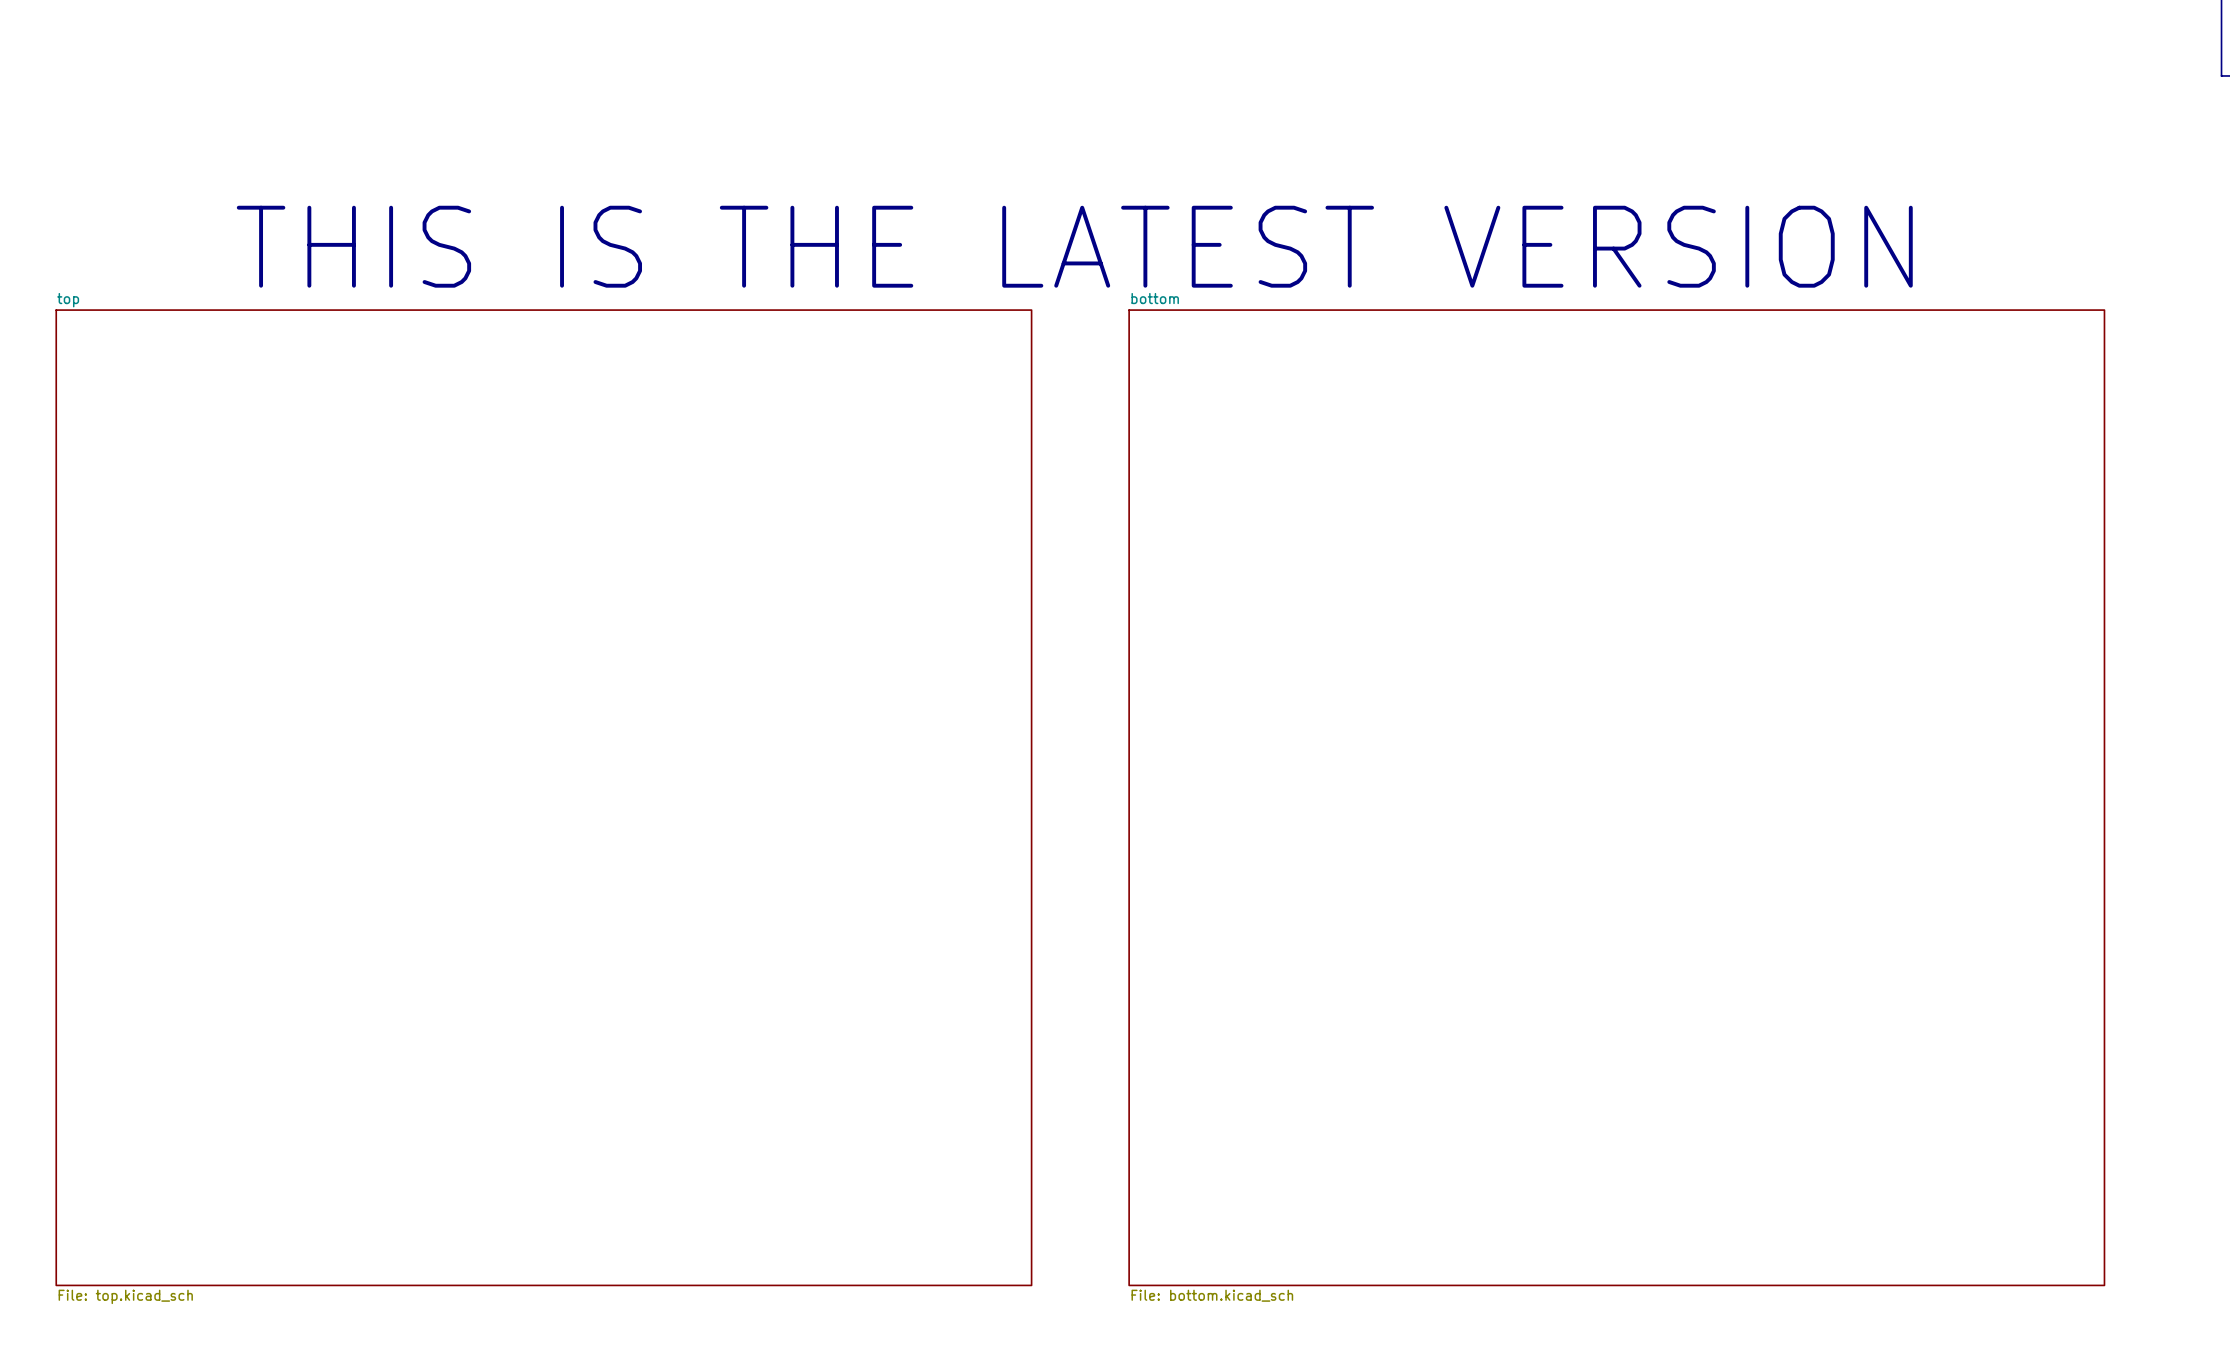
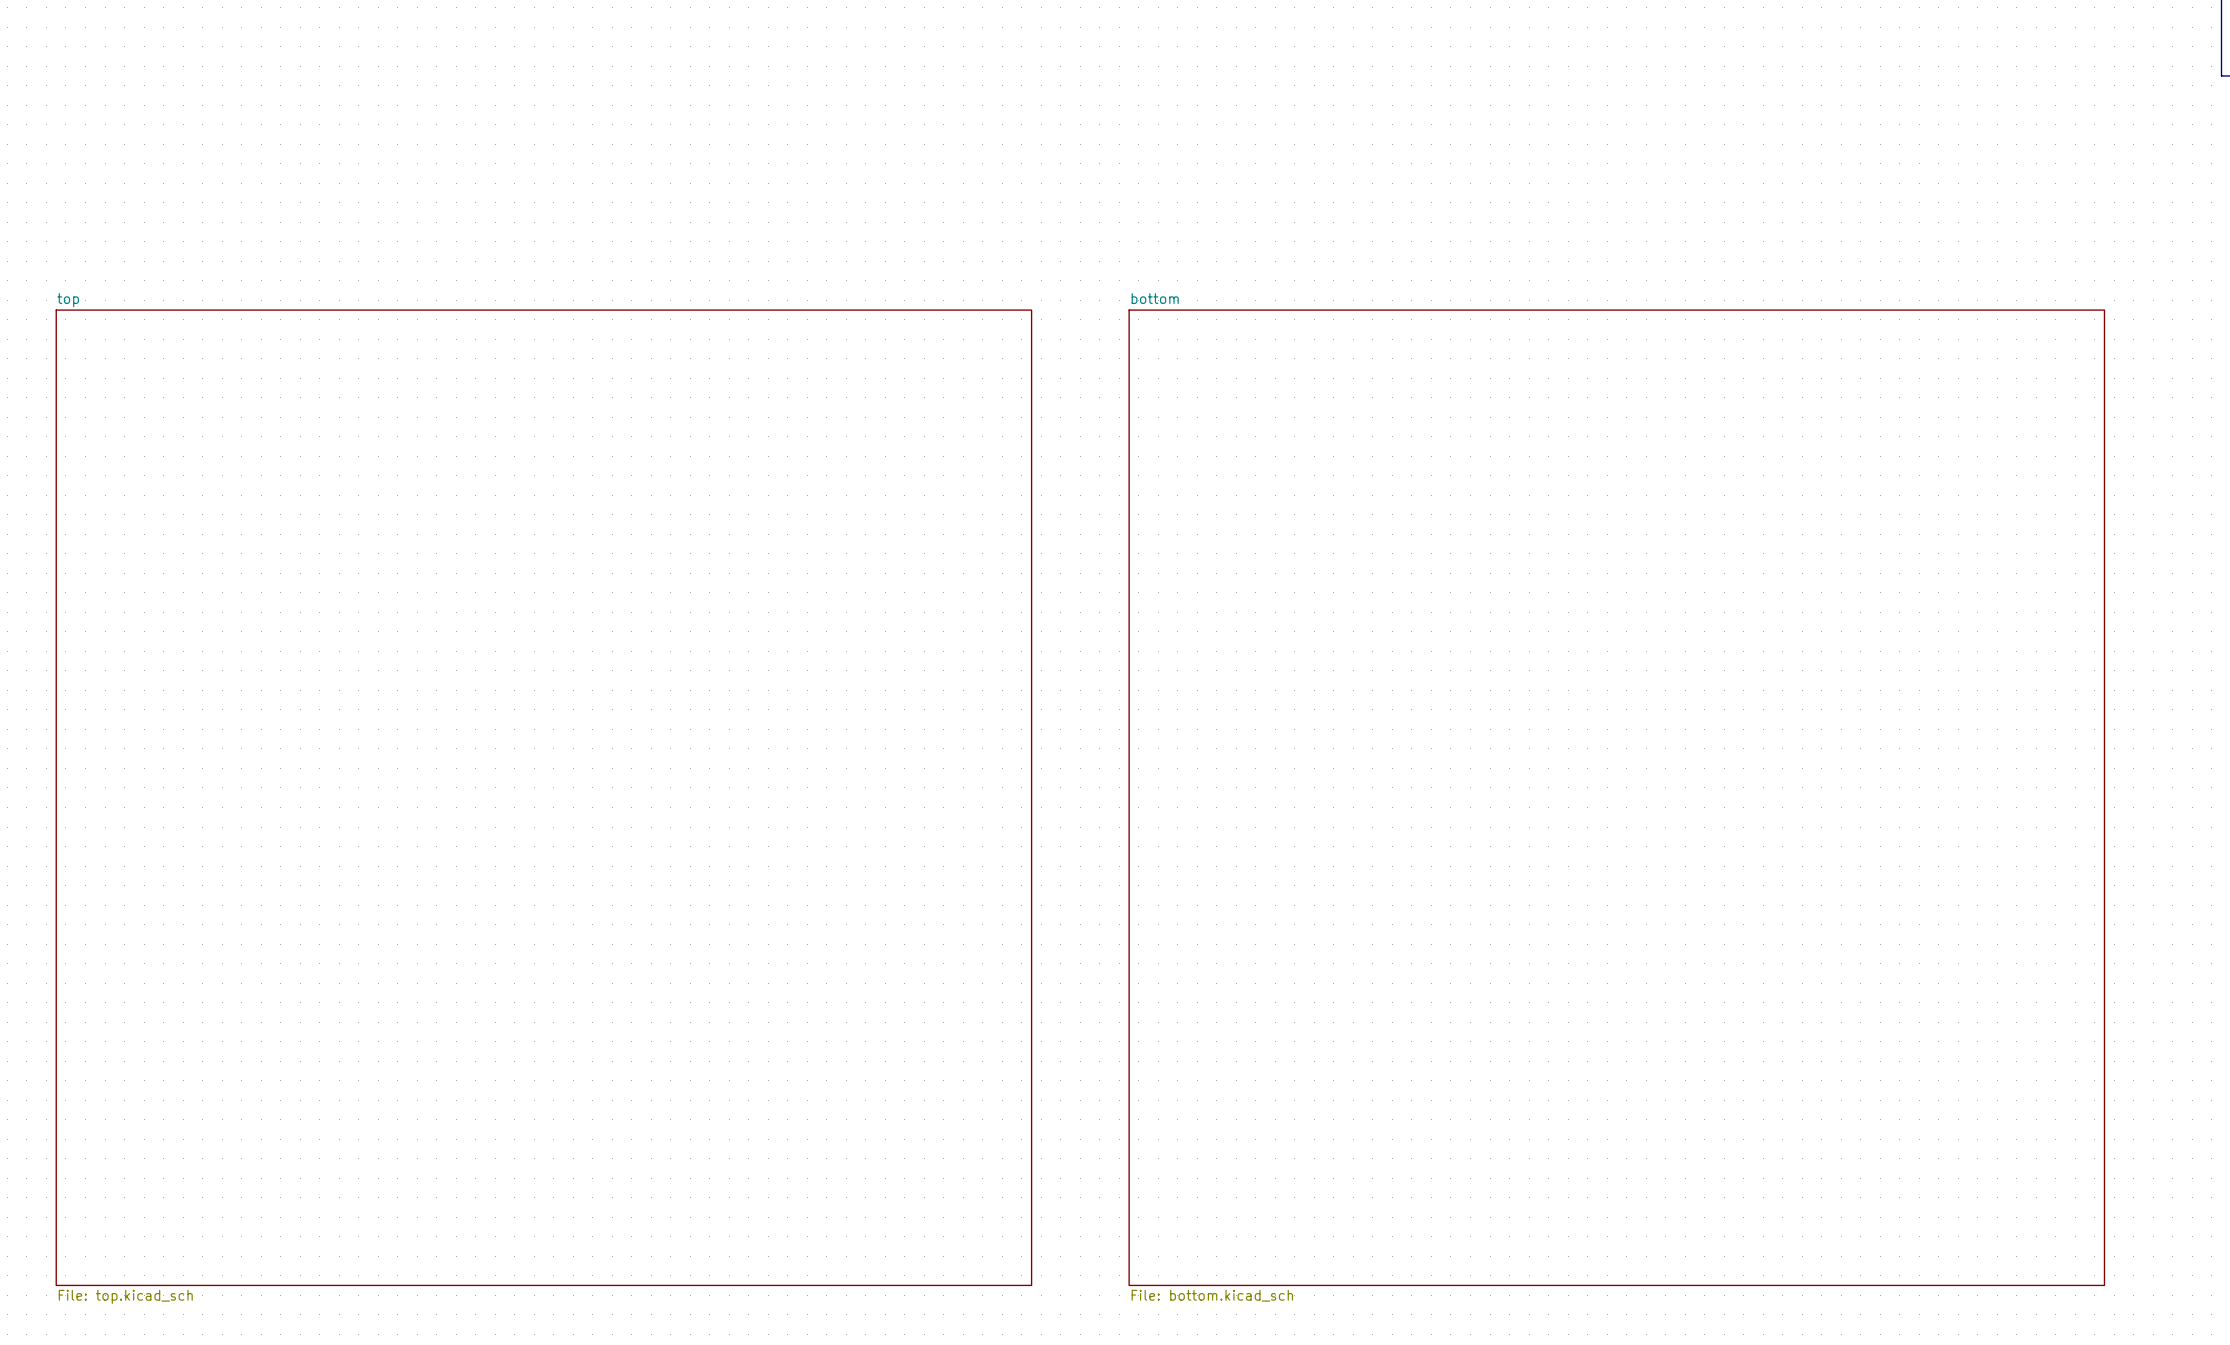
text: THIS IS THE LATEST VERSION (1074, 246) -> none

